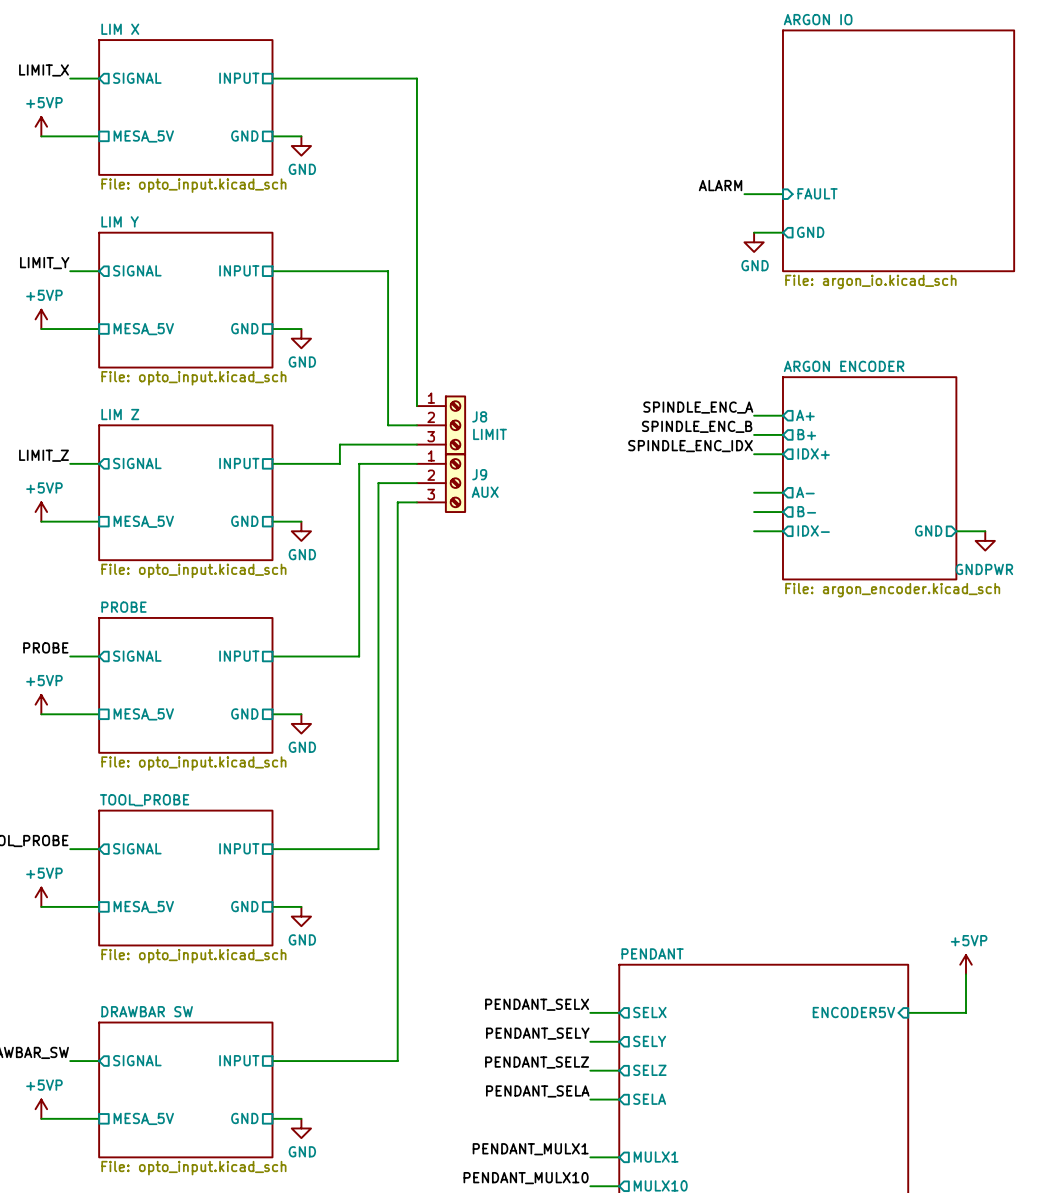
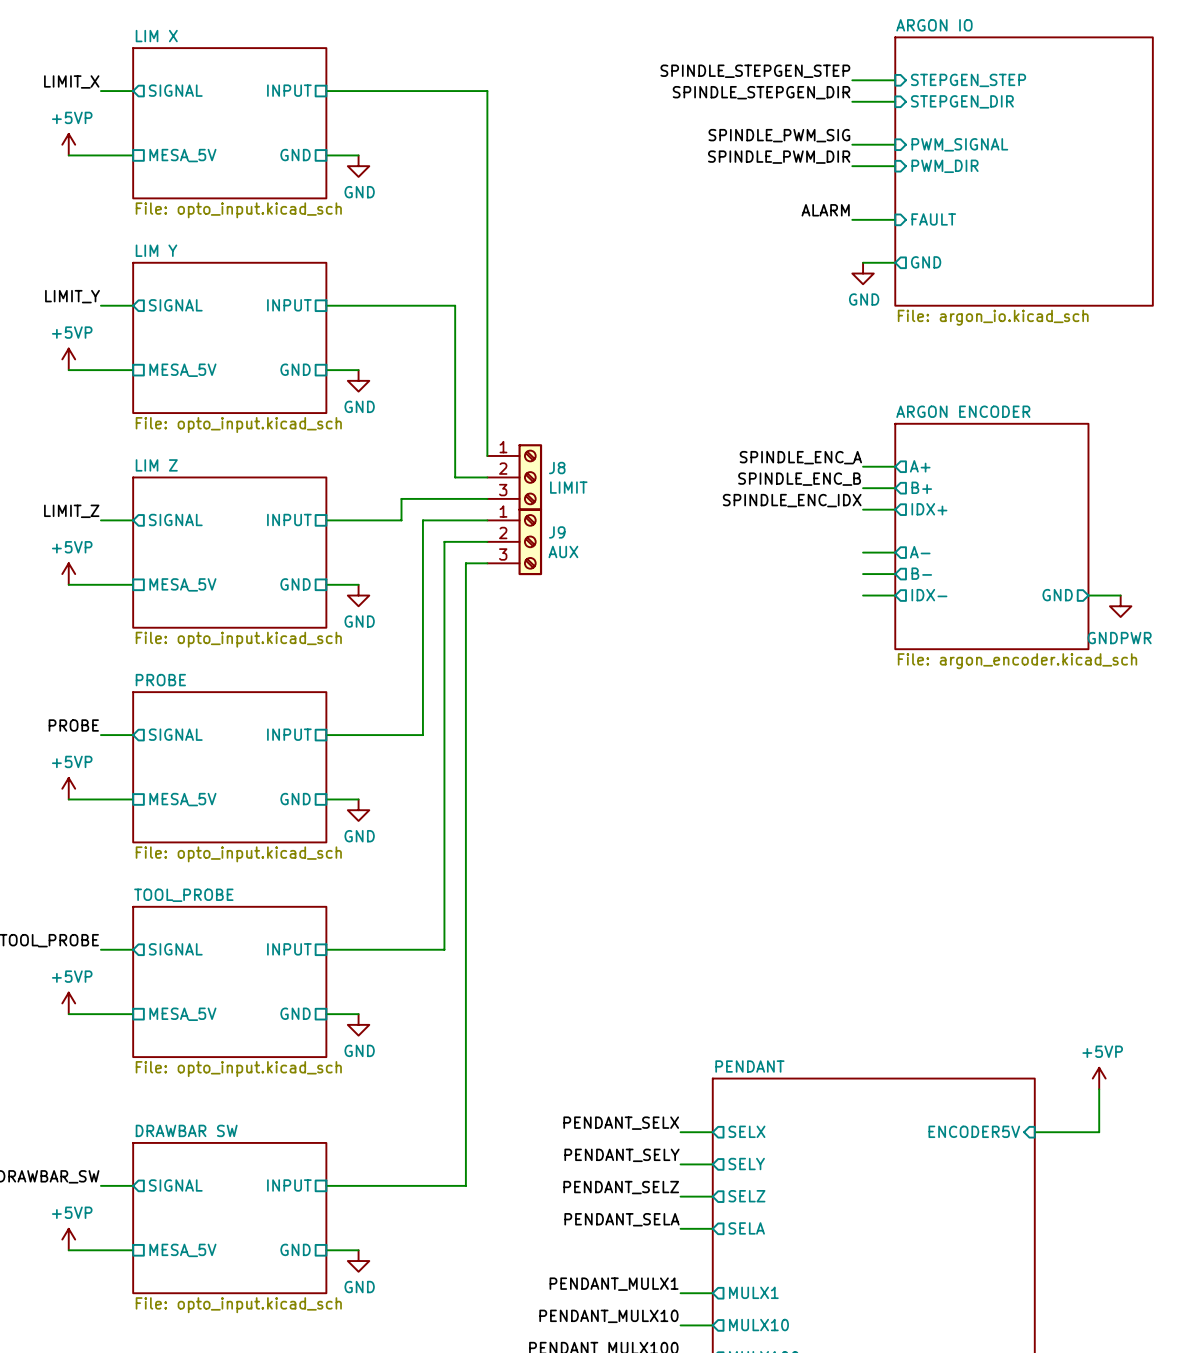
label: none -> SPINDLE_STEPGEN_STEP (755, 71)
wire: none -> (852, 80) (895, 80)
sheet pin: none -> STEPGEN_STEP (968, 80)
label: none -> SPINDLE_STEPGEN_DIR (761, 92)
wire: none -> (852, 101) (895, 101)
sheet pin: none -> STEPGEN_DIR (962, 101)
label: none -> SPINDLE_PWM_SIG (779, 135)
wire: none -> (852, 144) (895, 144)
sheet pin: none -> PWM_SIGNAL (959, 144)
label: none -> SPINDLE_PWM_DIR (779, 157)
wire: none -> (852, 166) (895, 166)
sheet pin: none -> PWM_DIR (945, 166)

